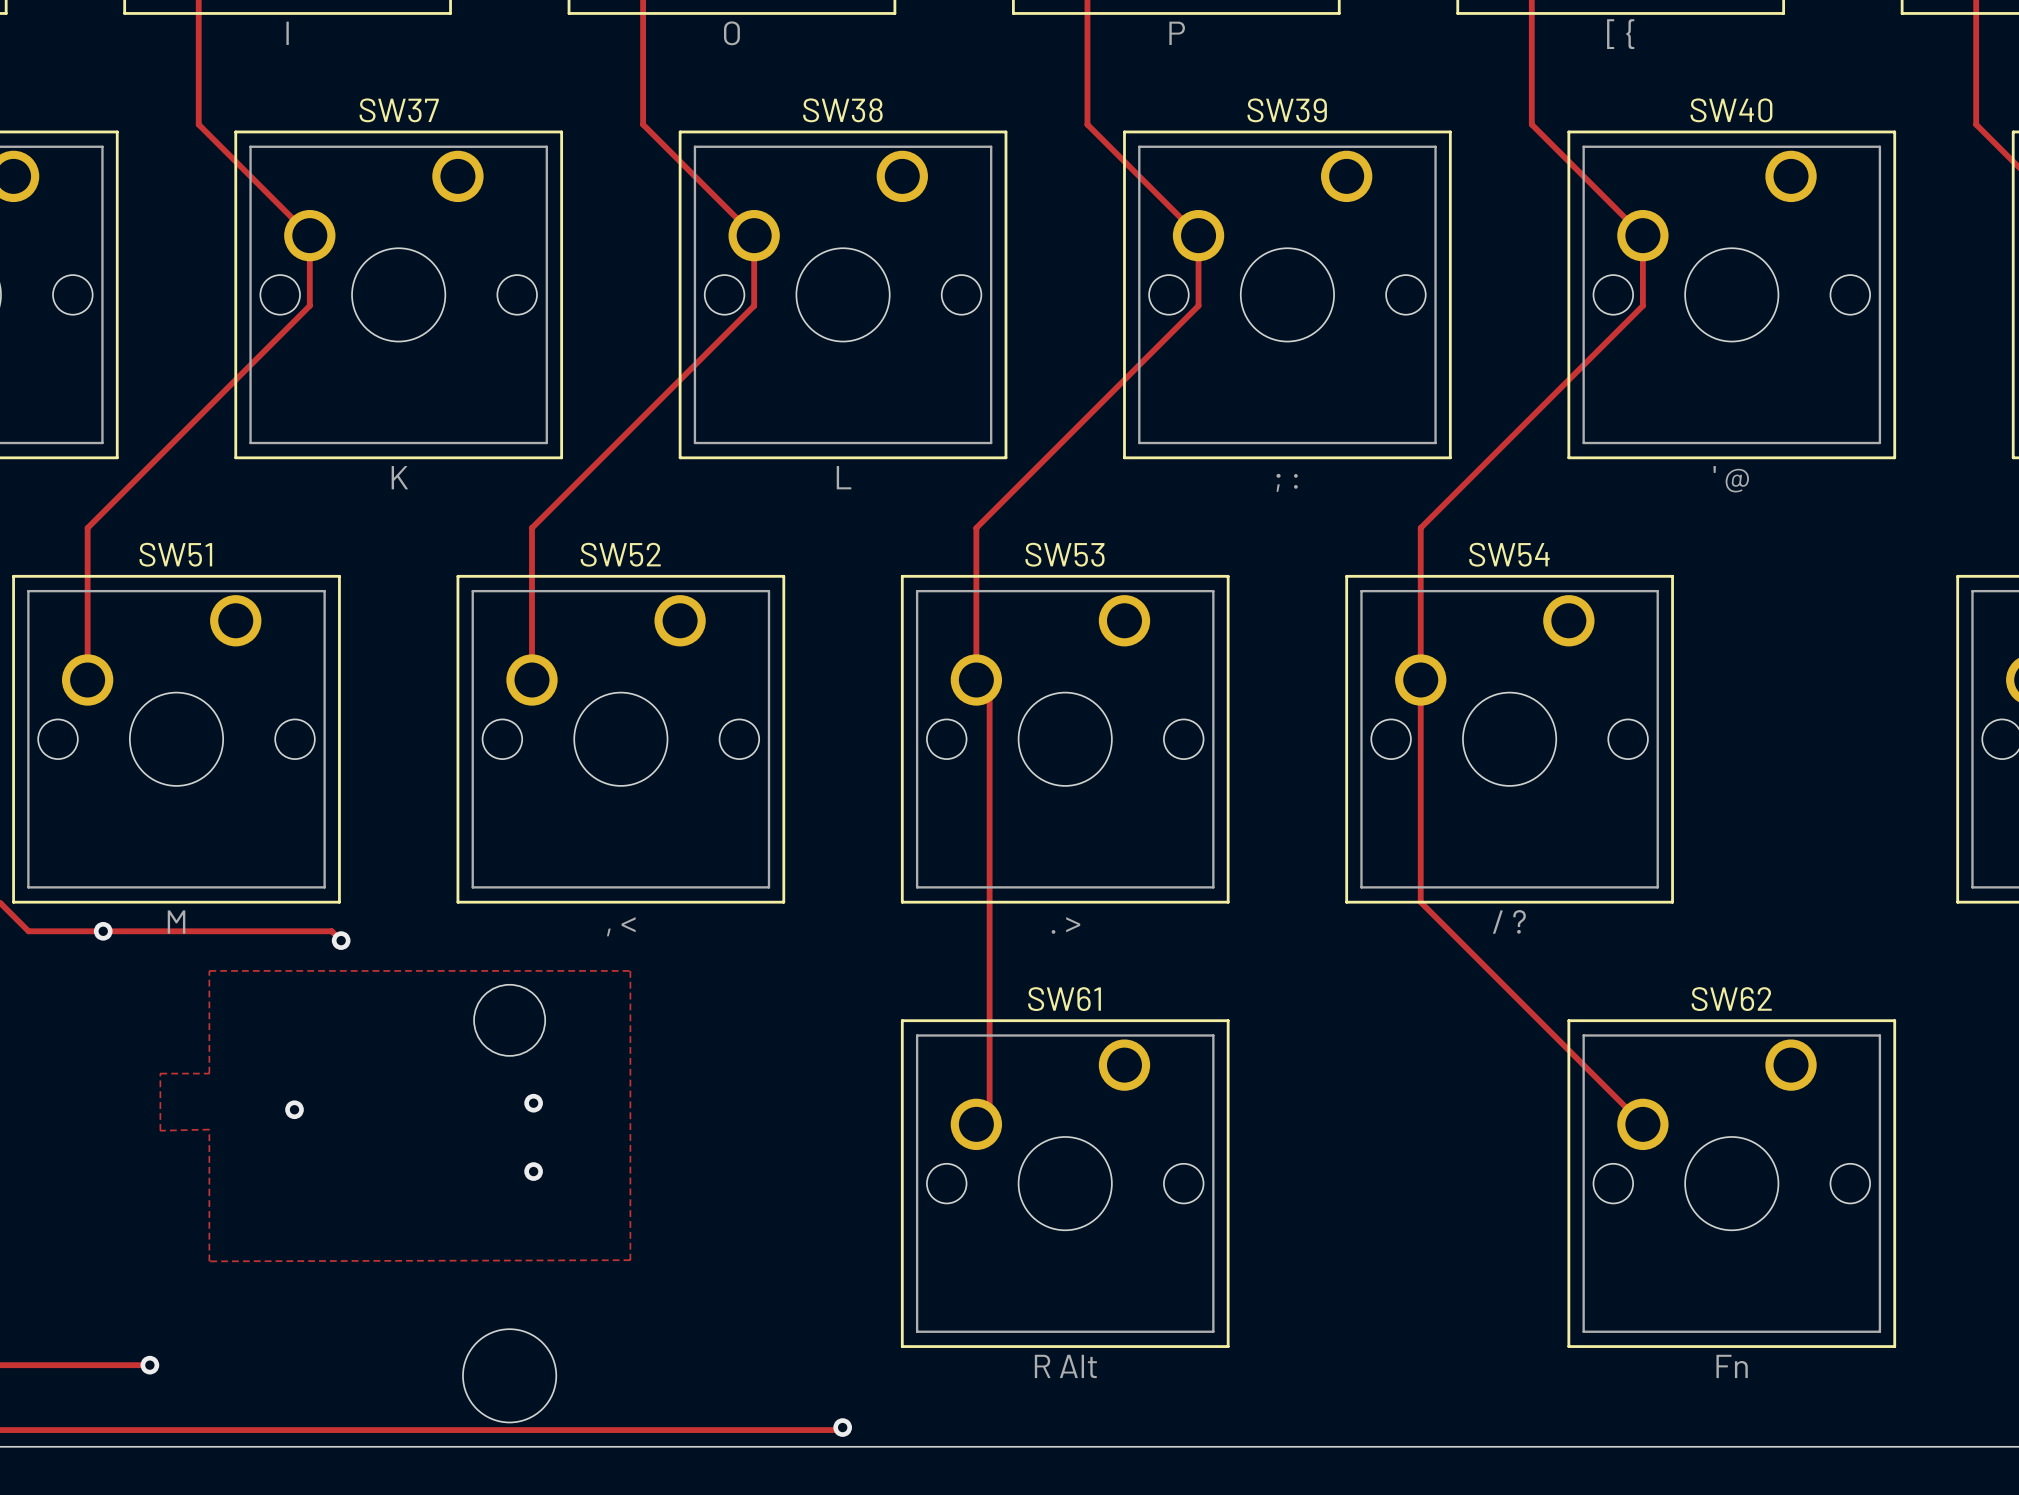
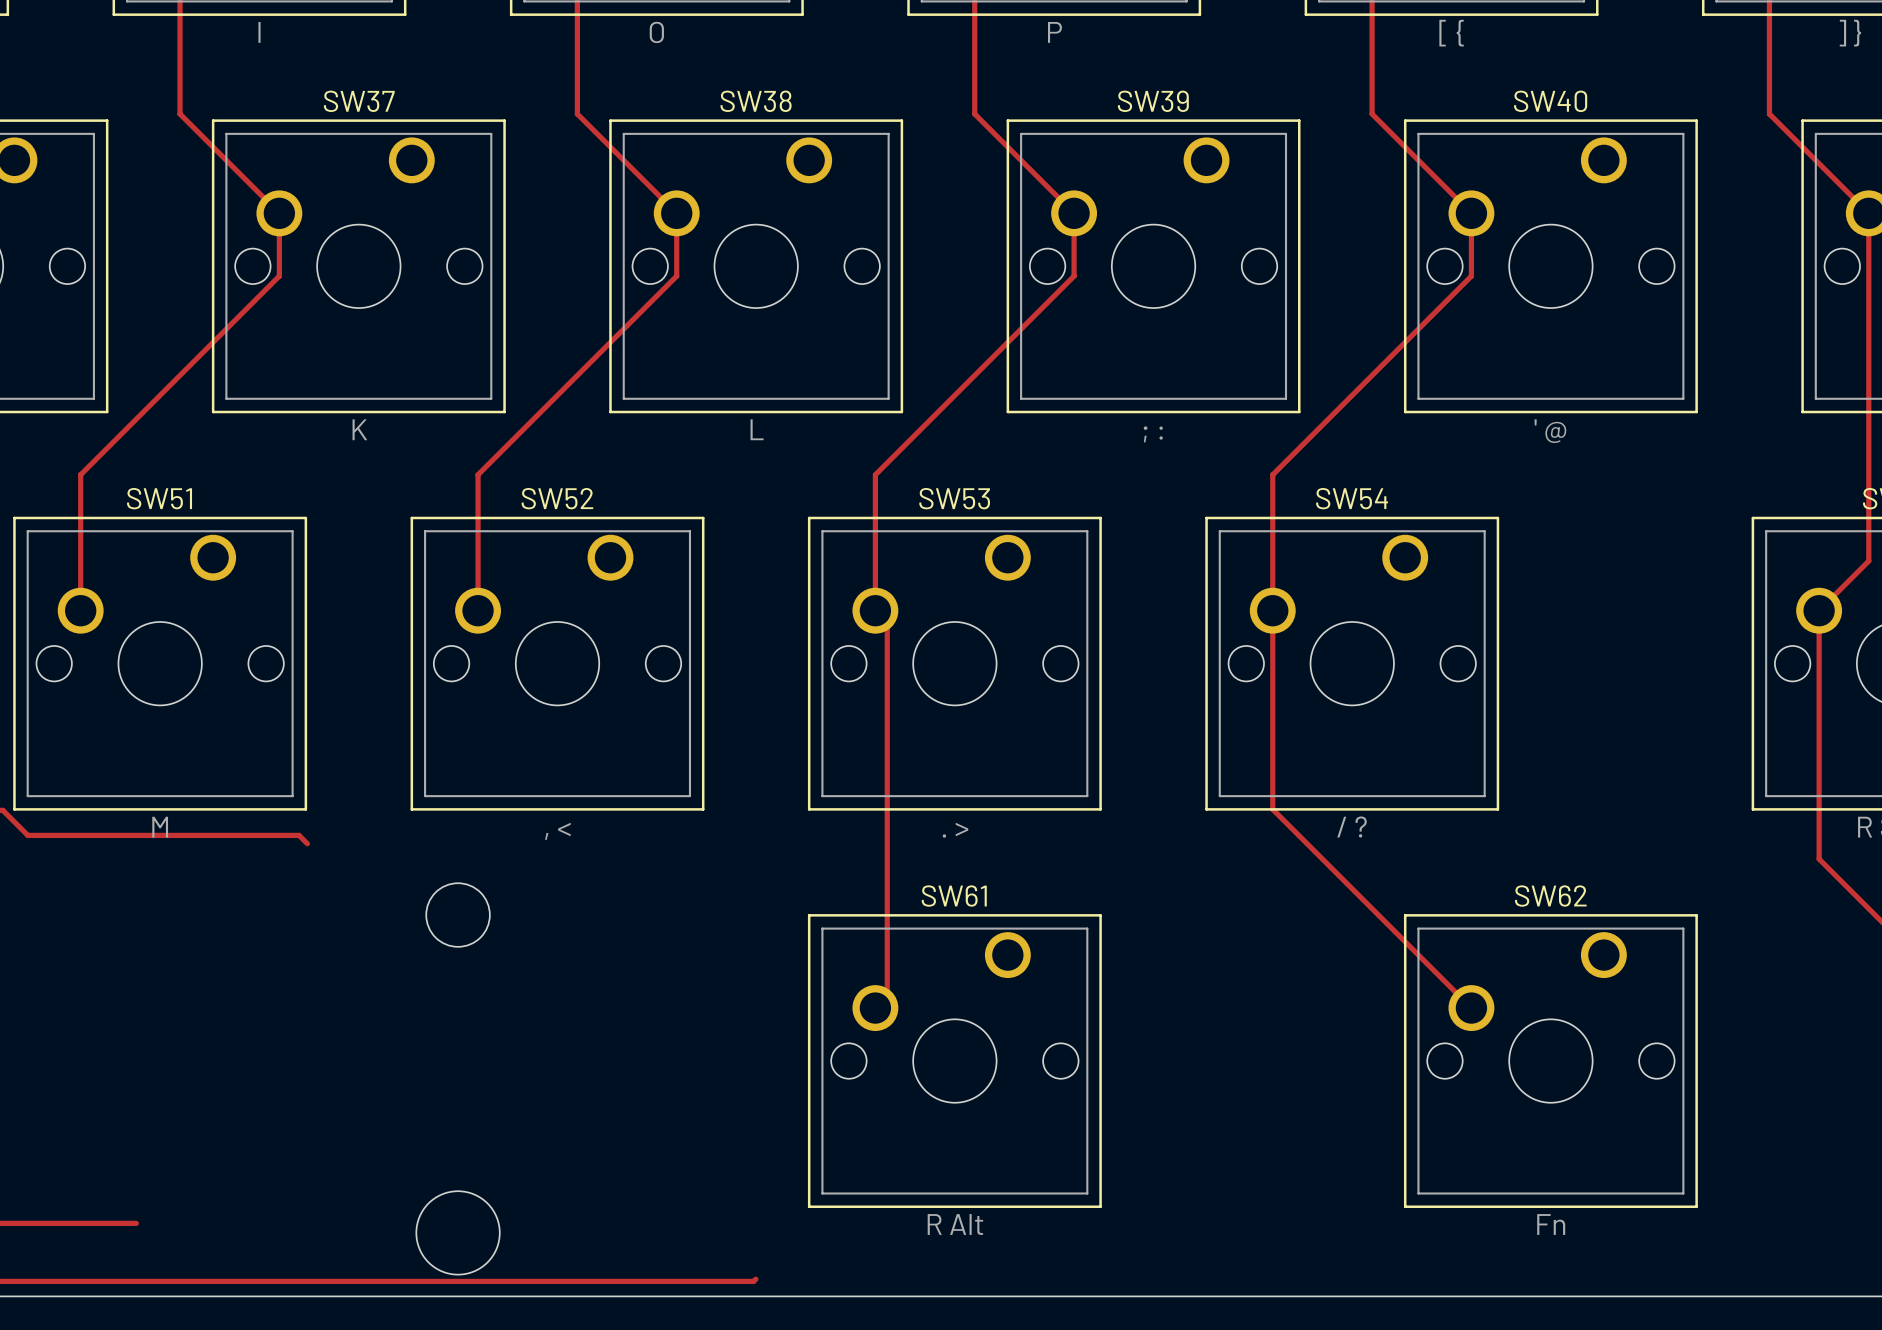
via: (103, 931) -> none
via: (341, 940) -> none
zone outline: (209, 970) (209, 1073) (160, 1073) (160, 1130) (209, 1129) (209, 1261) (630, 1260) (630, 970) (209, 970) -> none
via: (533, 1103) -> none
via: (294, 1109) -> none
via: (533, 1171) -> none
via: (149, 1365) -> none
via: (842, 1427) -> none

